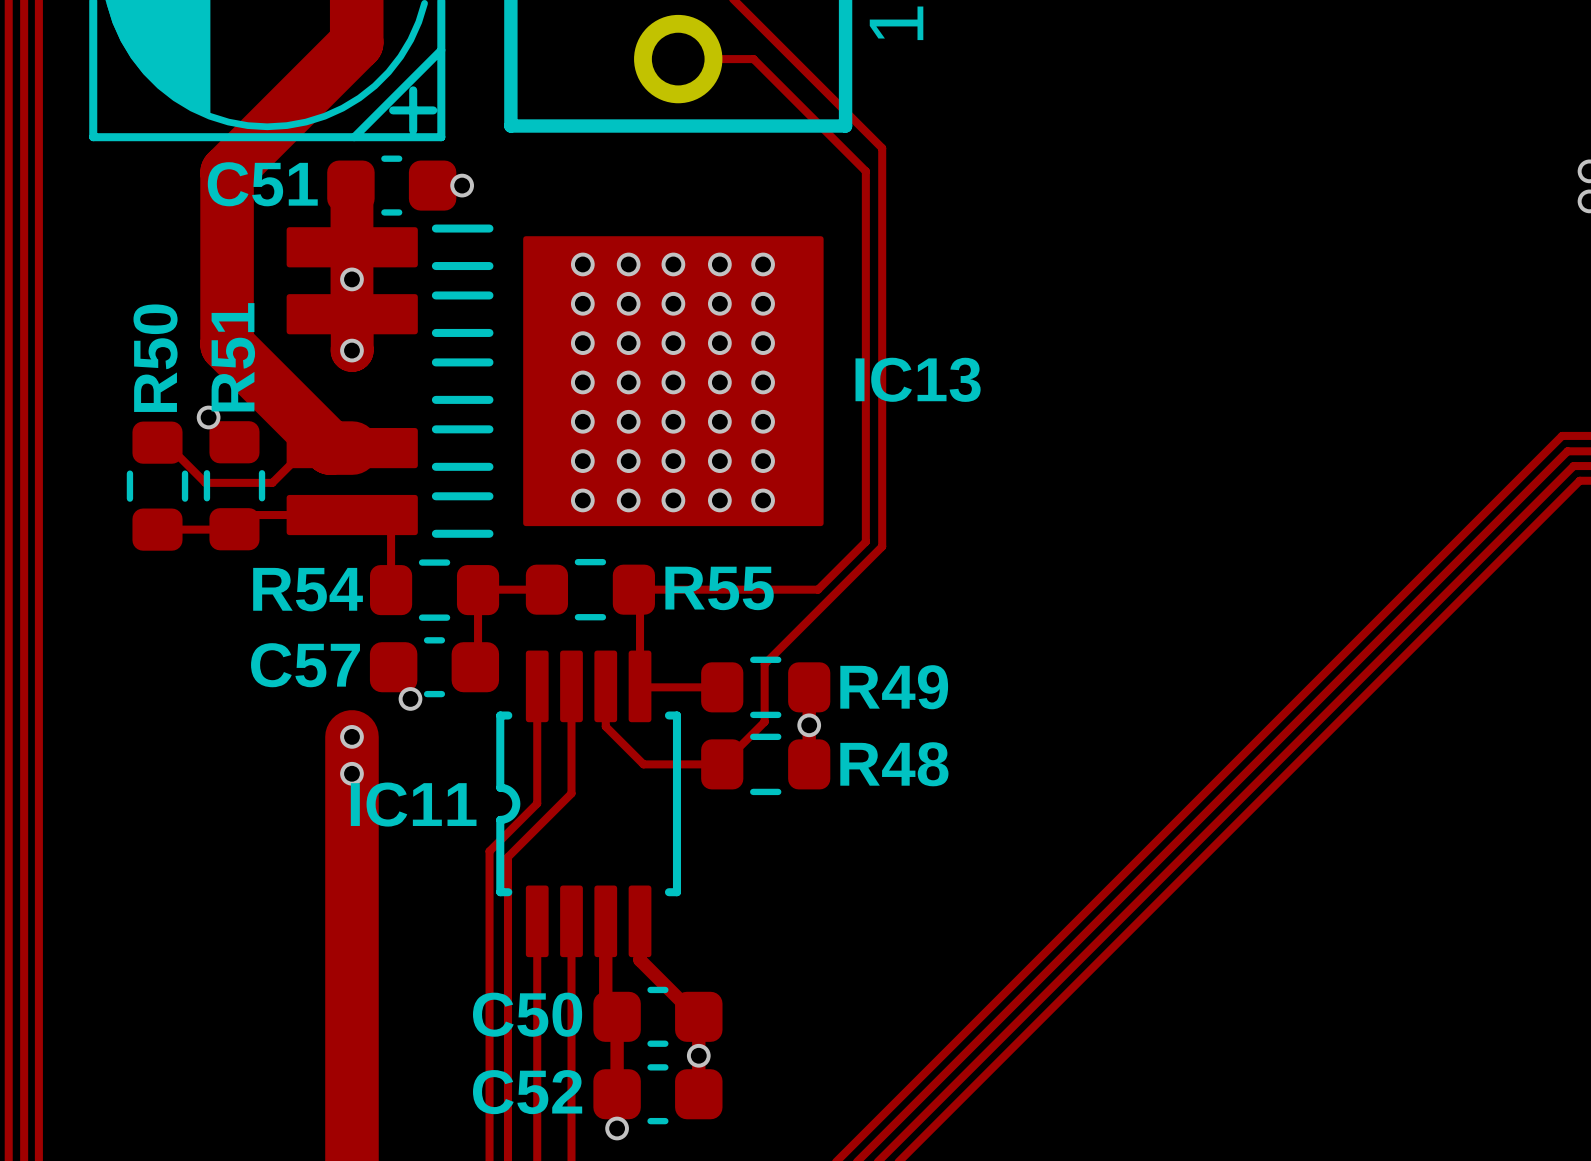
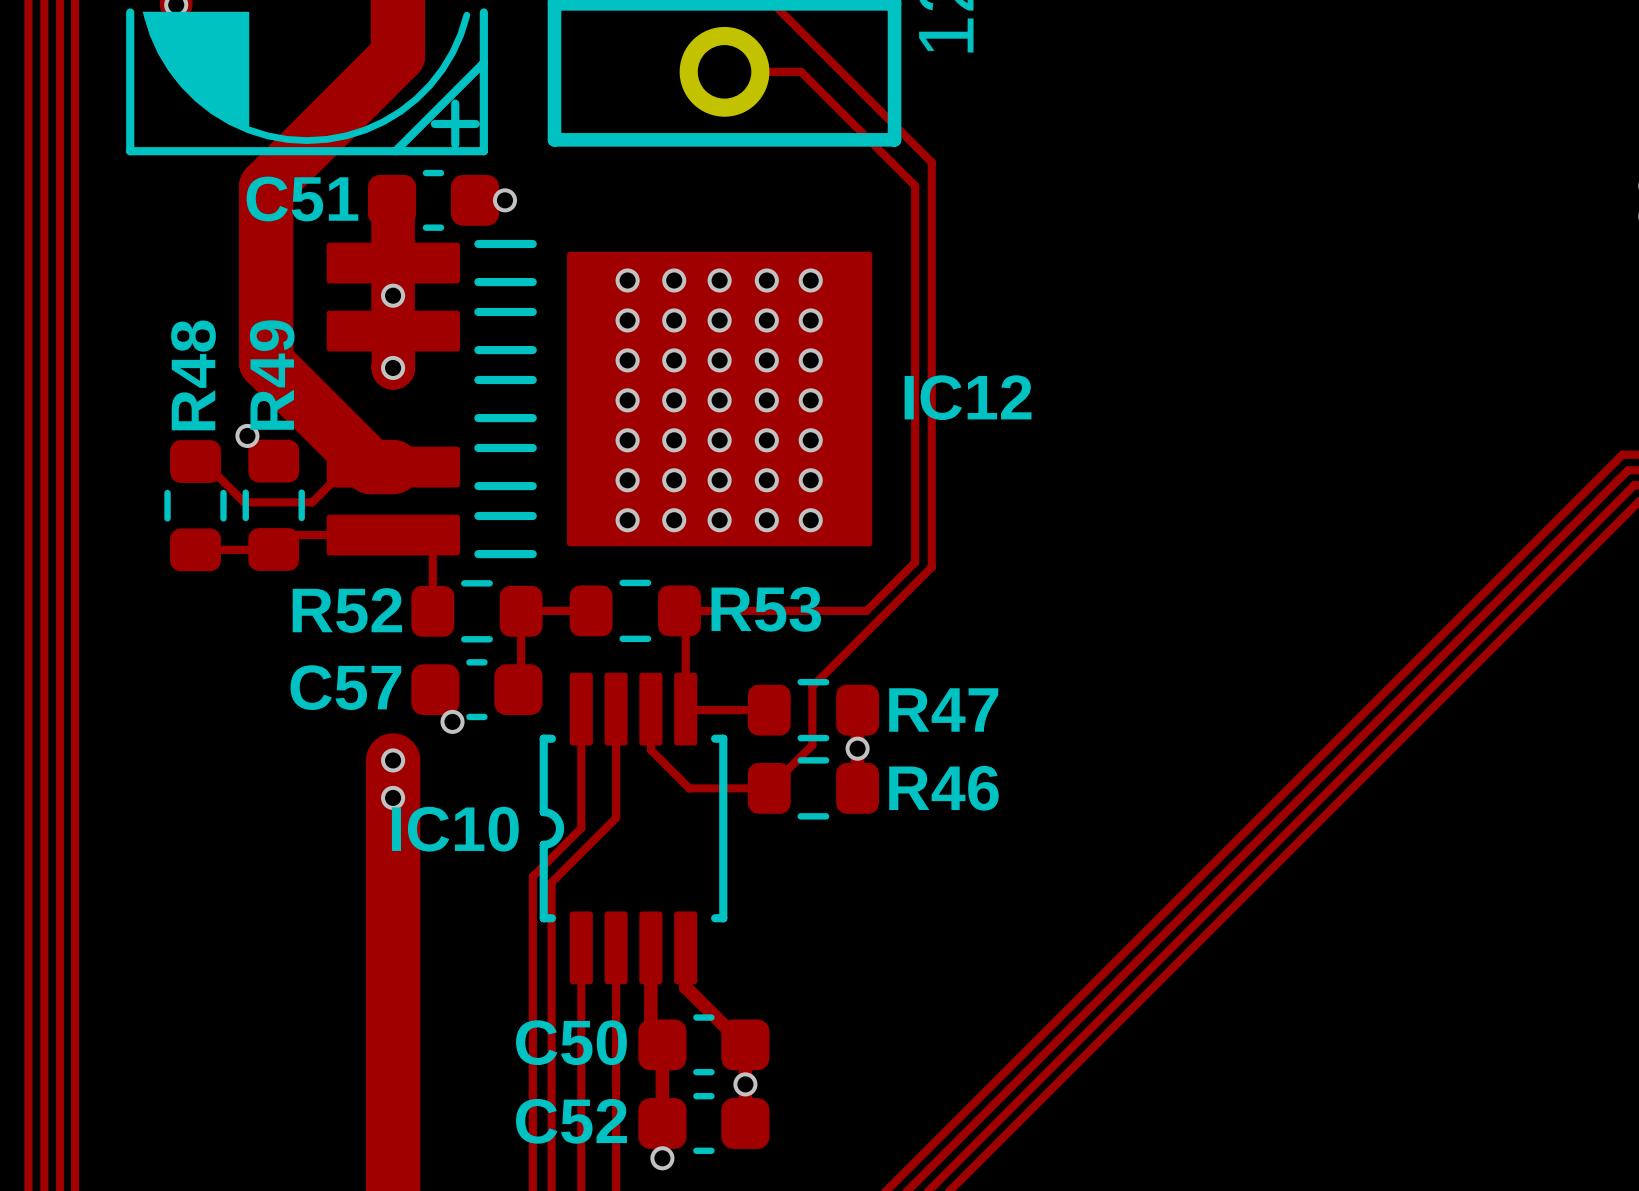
R51 name: R51 (233, 357) -> R49 (272, 375)
R50 name: R50 (155, 358) -> R48 (193, 375)
IC13 name: IC13 (918, 379) -> IC12 (968, 397)
R55 name: R55 (719, 588) -> R53 (766, 609)
R54 name: R54 (308, 589) -> R52 (347, 610)
R49 name: R49 (894, 687) -> R47 (943, 710)
R48 name: R48 (894, 764) -> R46 (943, 788)
IC11 name: IC11 (413, 804) -> IC10 (455, 829)

